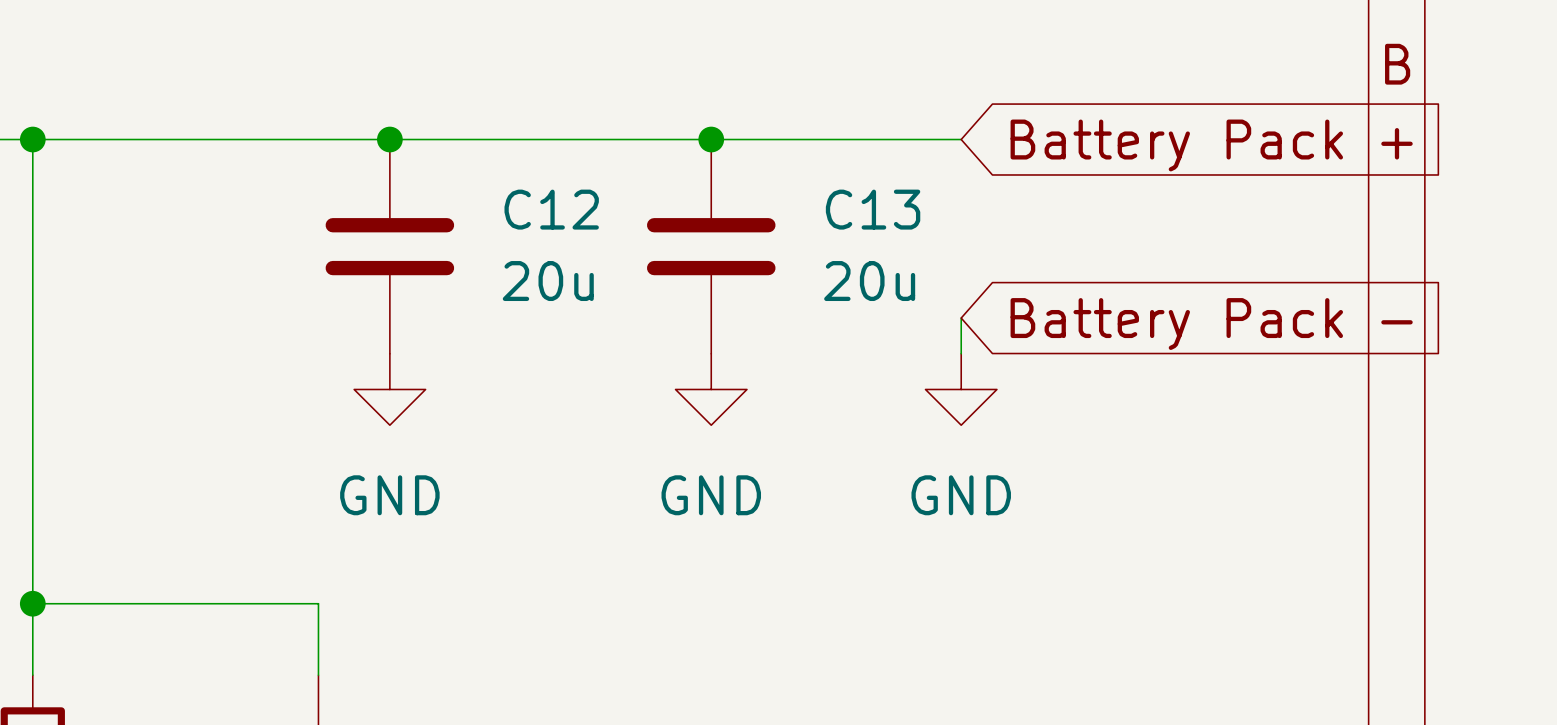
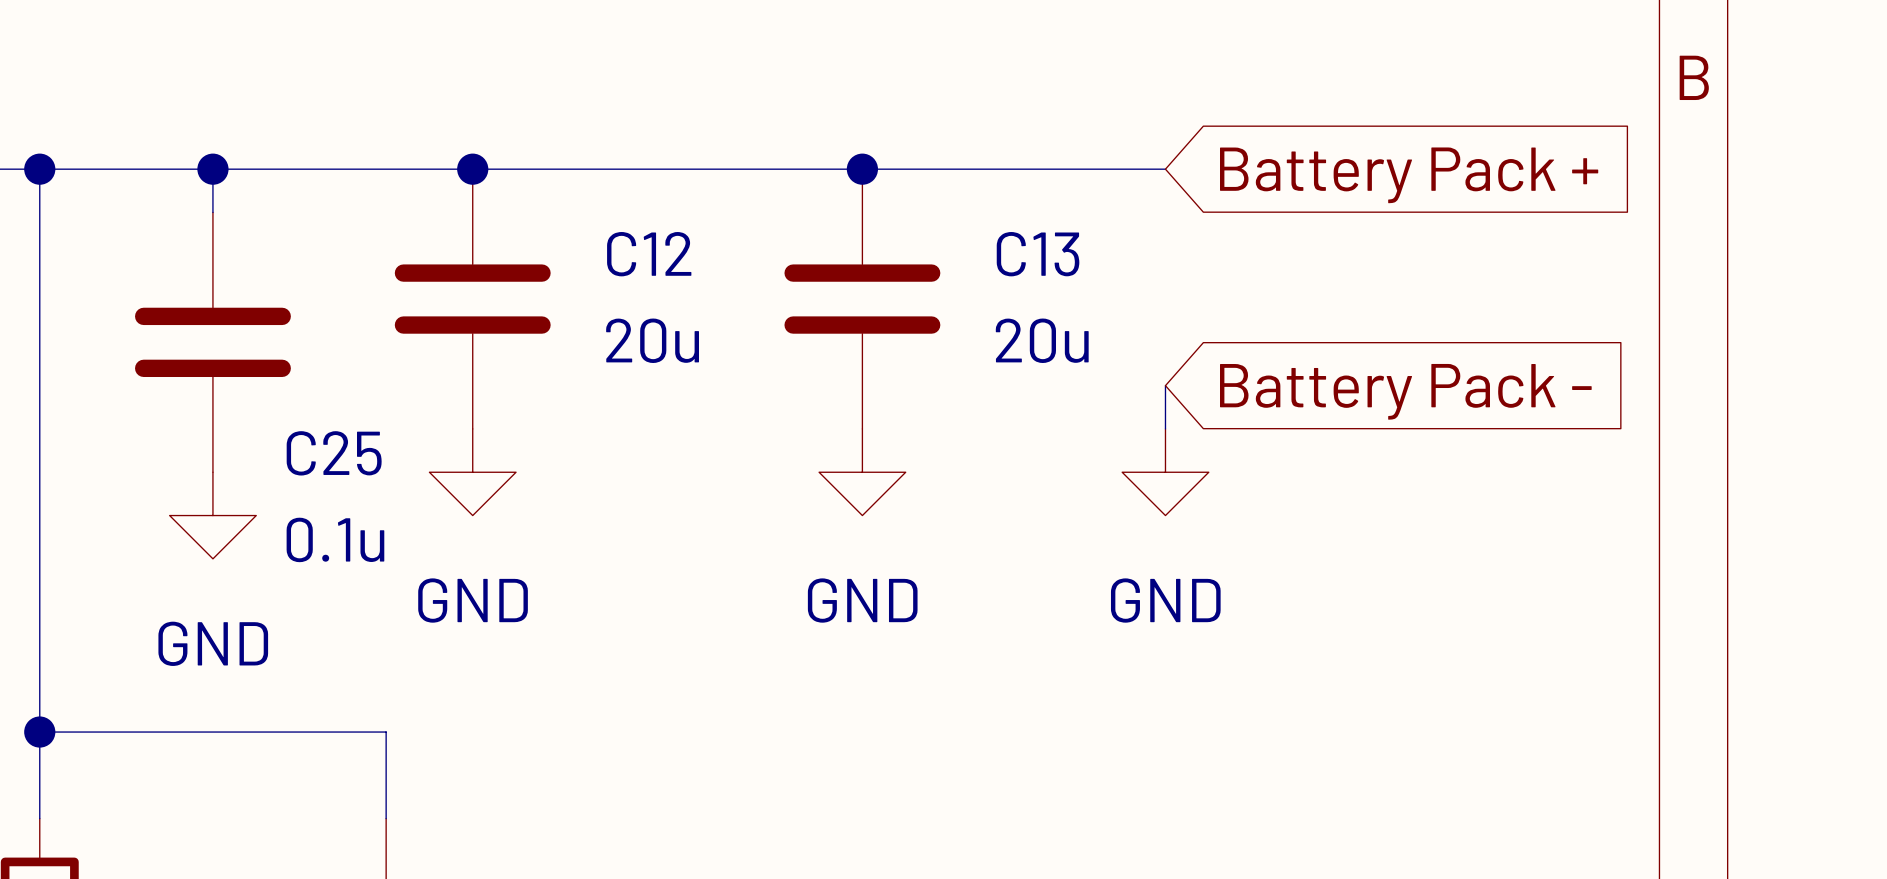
wire: none -> (212, 169) (212, 212)
junction: none -> (212, 169)
C25: none -> 0.1u (212, 342)
power symbol: none -> GND (212, 515)

